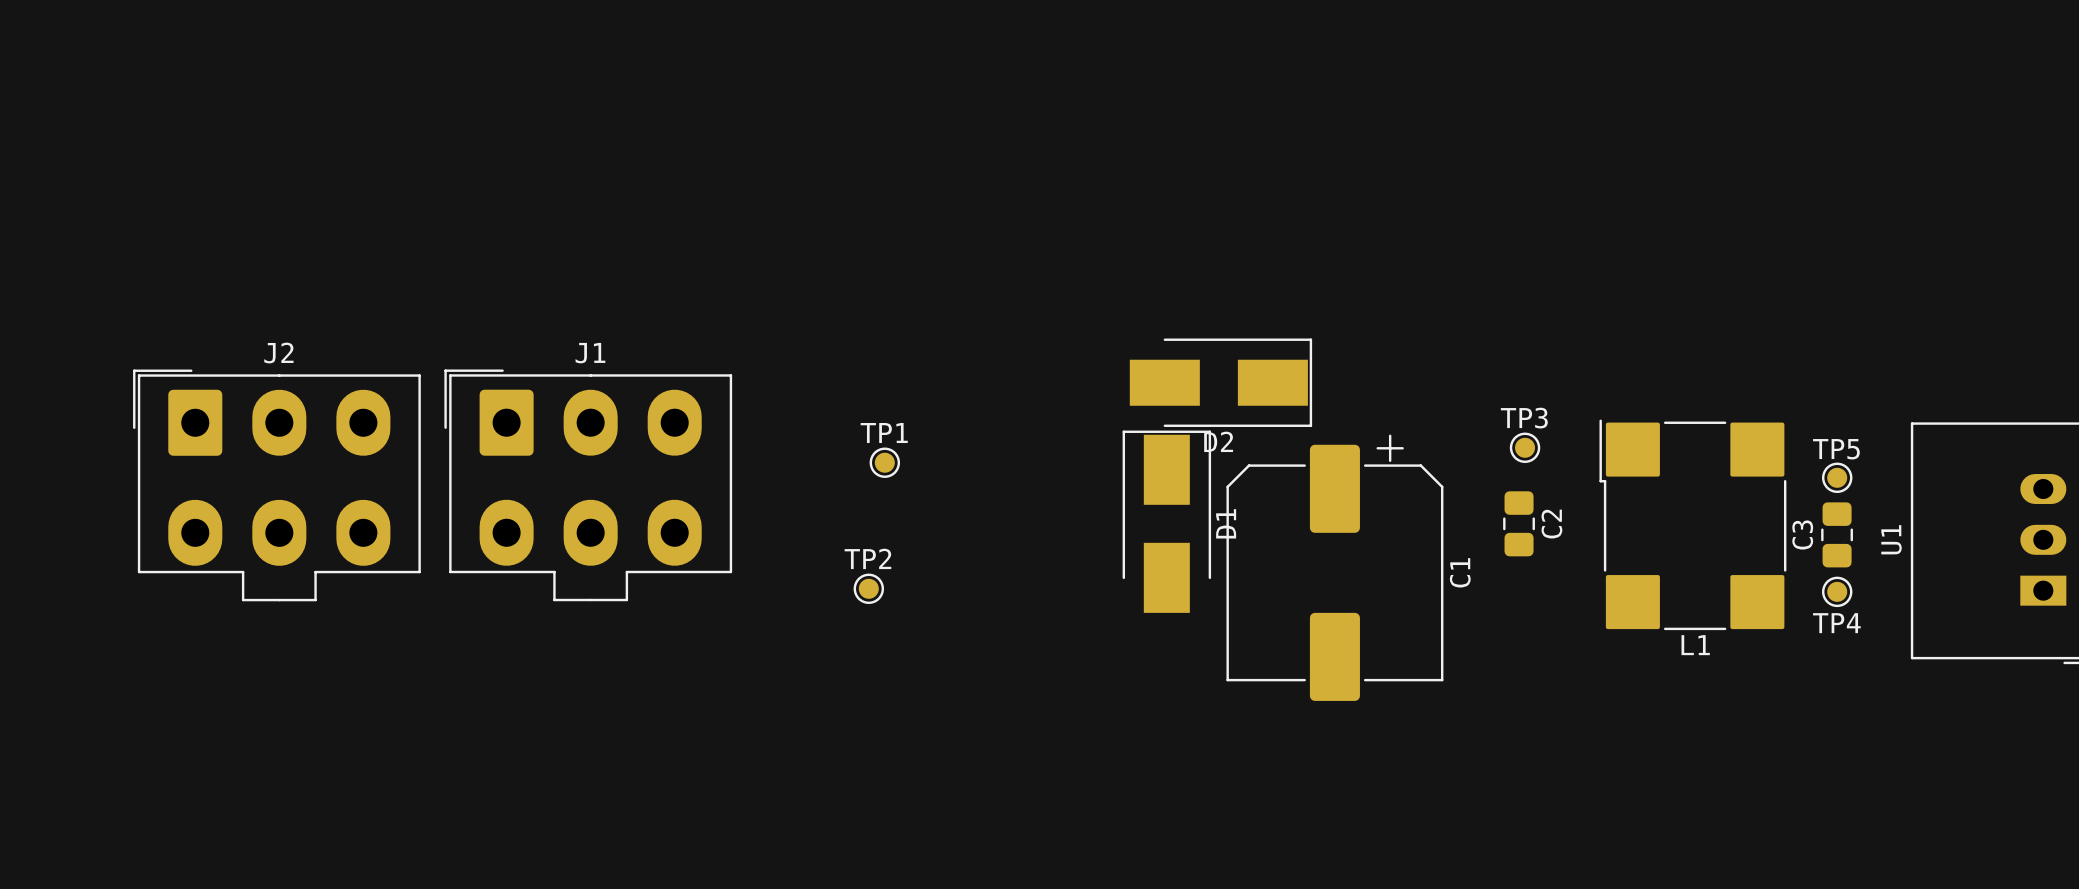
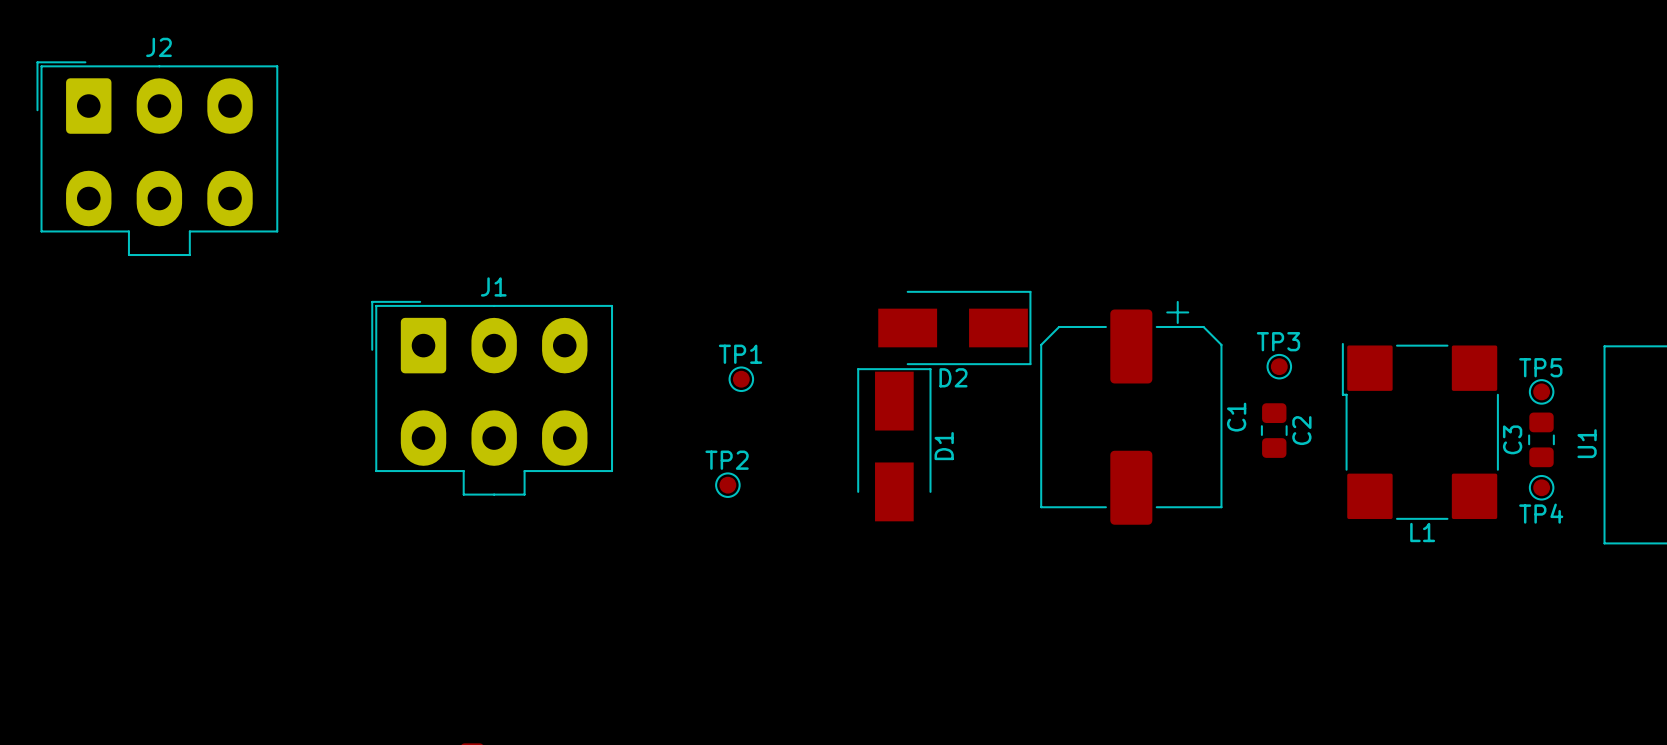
D2 position: (1220, 382) -> (954, 327)
J2 position: (276, 485) -> (157, 158)
D1 position: (1166, 521) -> (894, 444)
C1 position: (1334, 567) -> (1131, 412)

